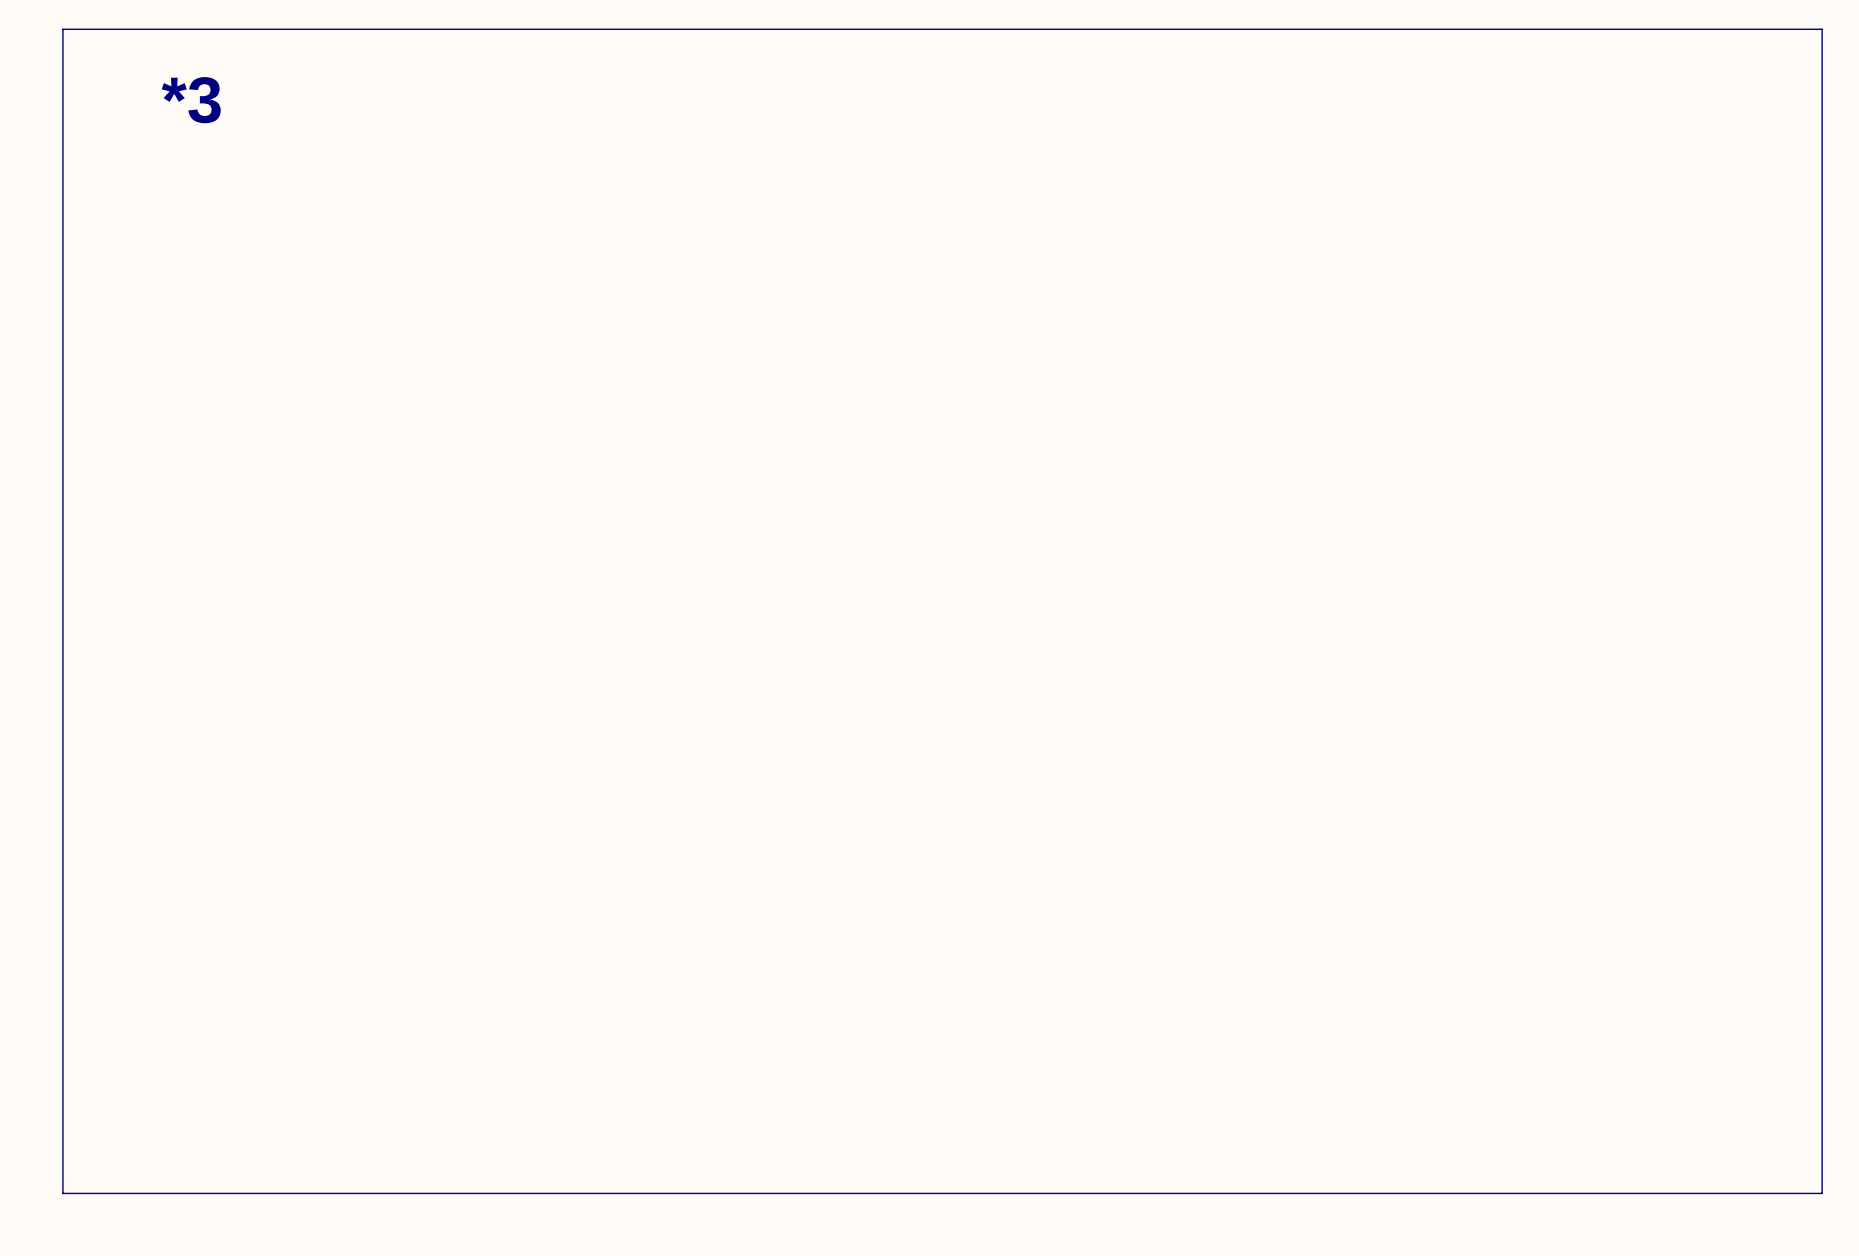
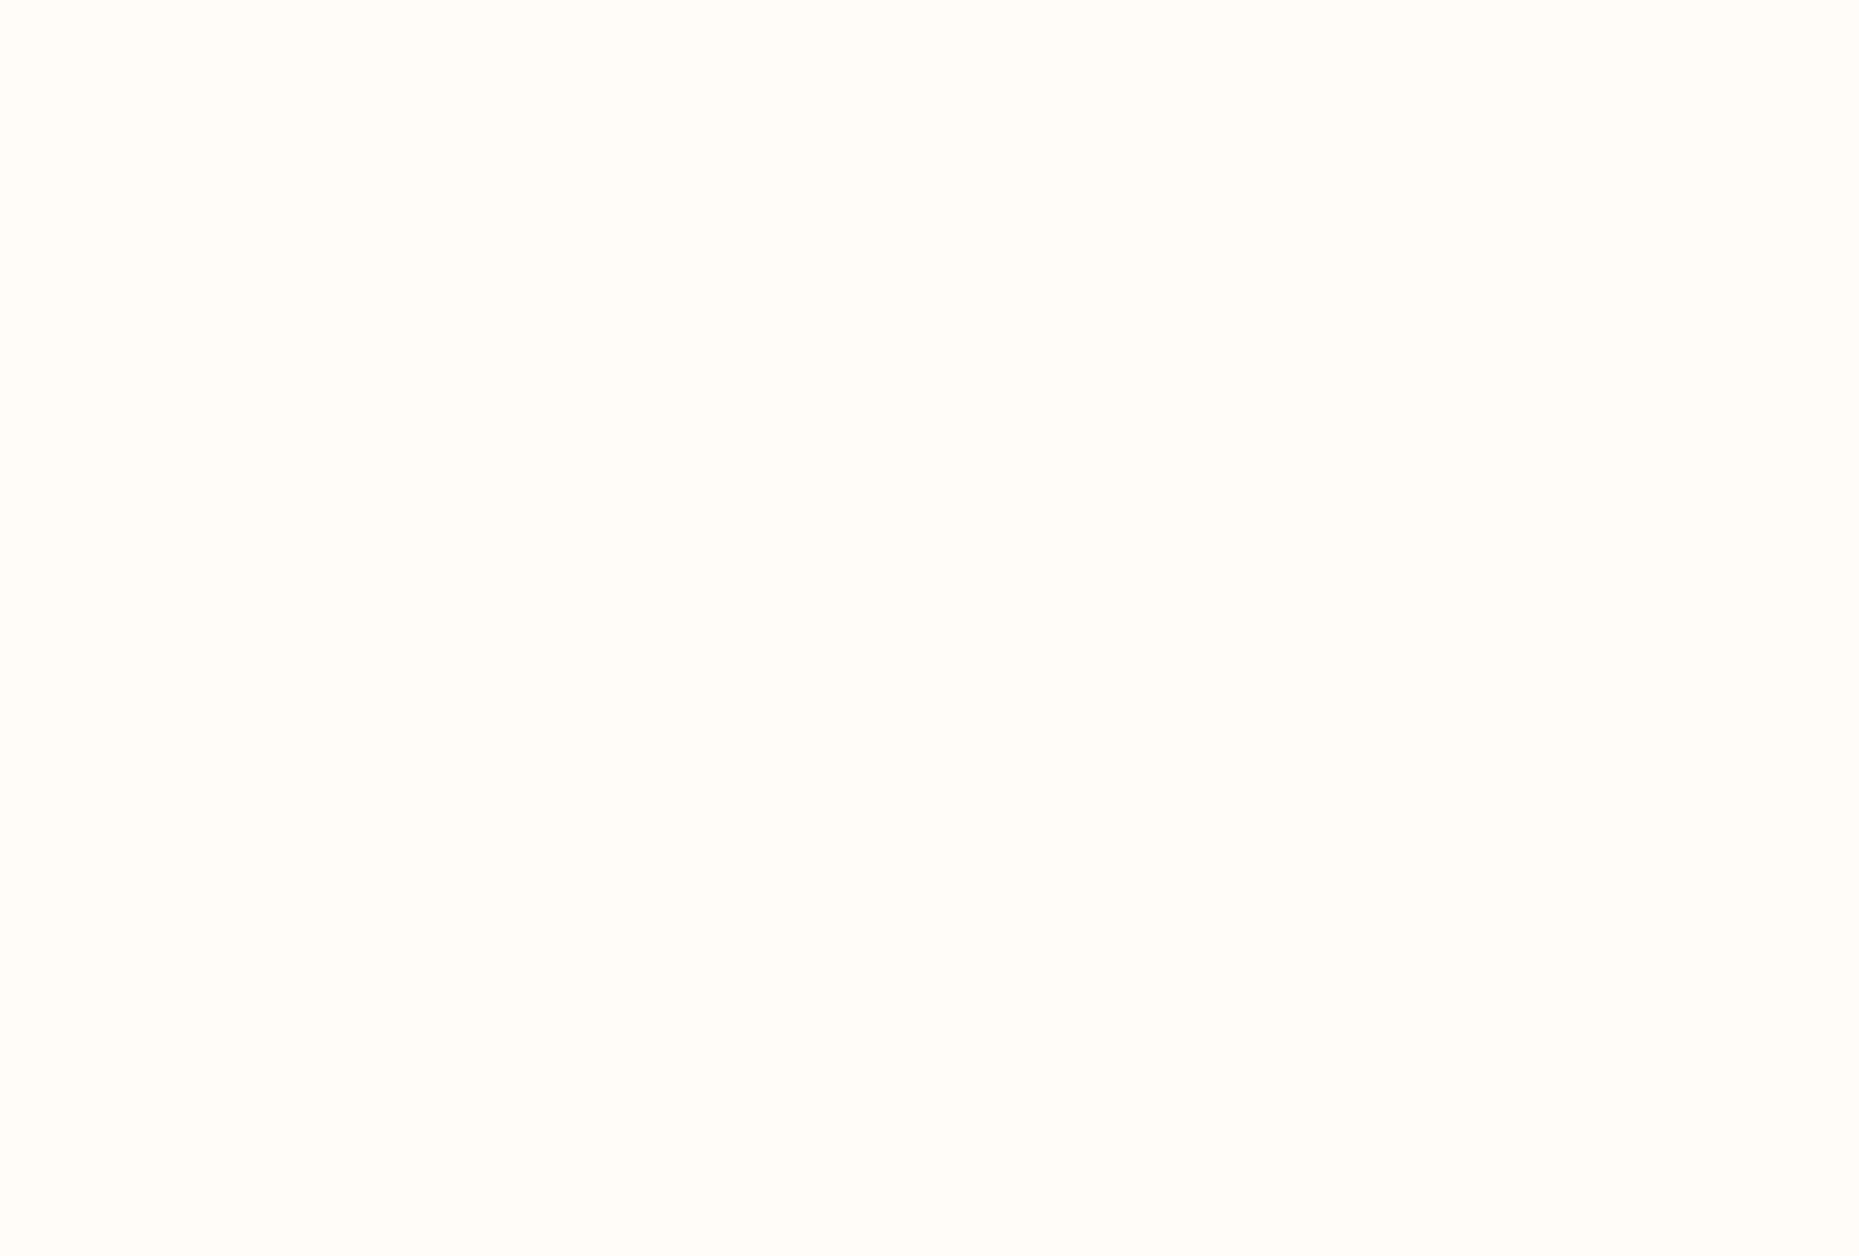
line: (62, 29) (1822, 29) (1822, 1193) (62, 1193) (62, 29) -> none
text: *3 (191, 100) -> none

